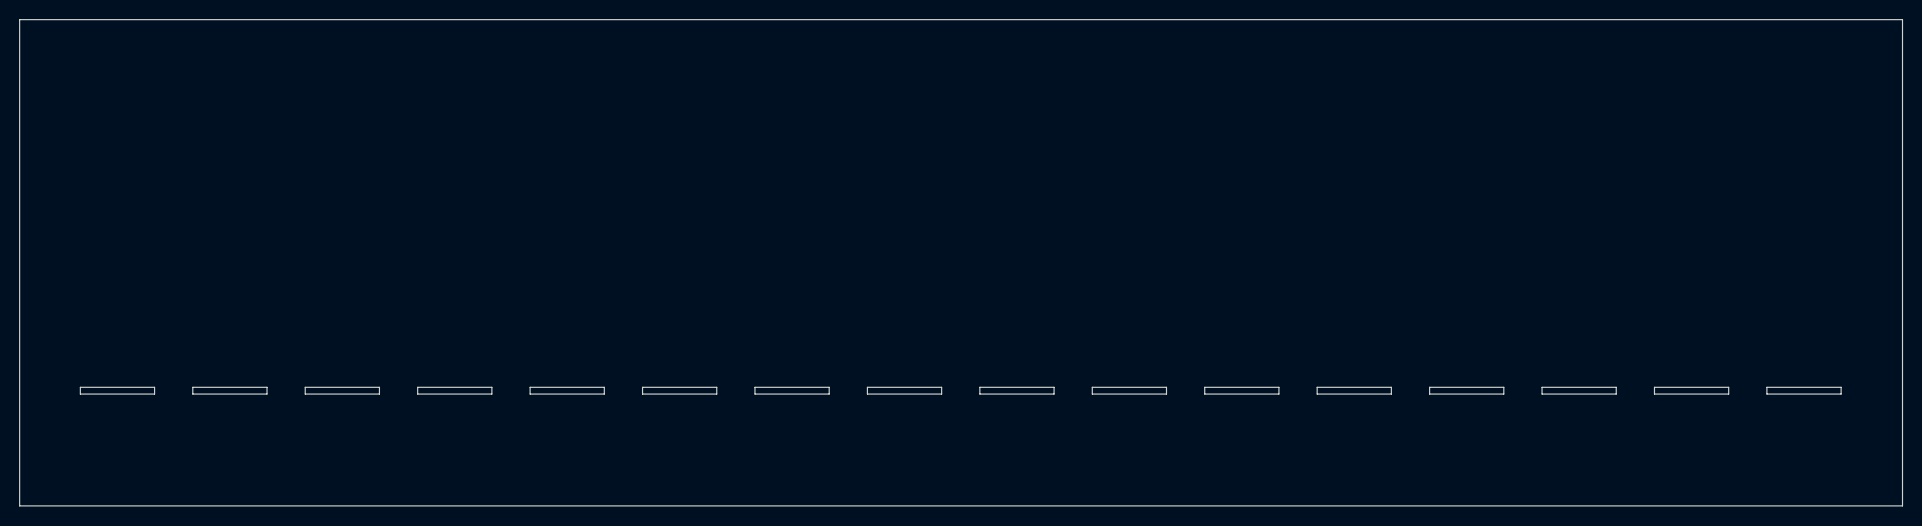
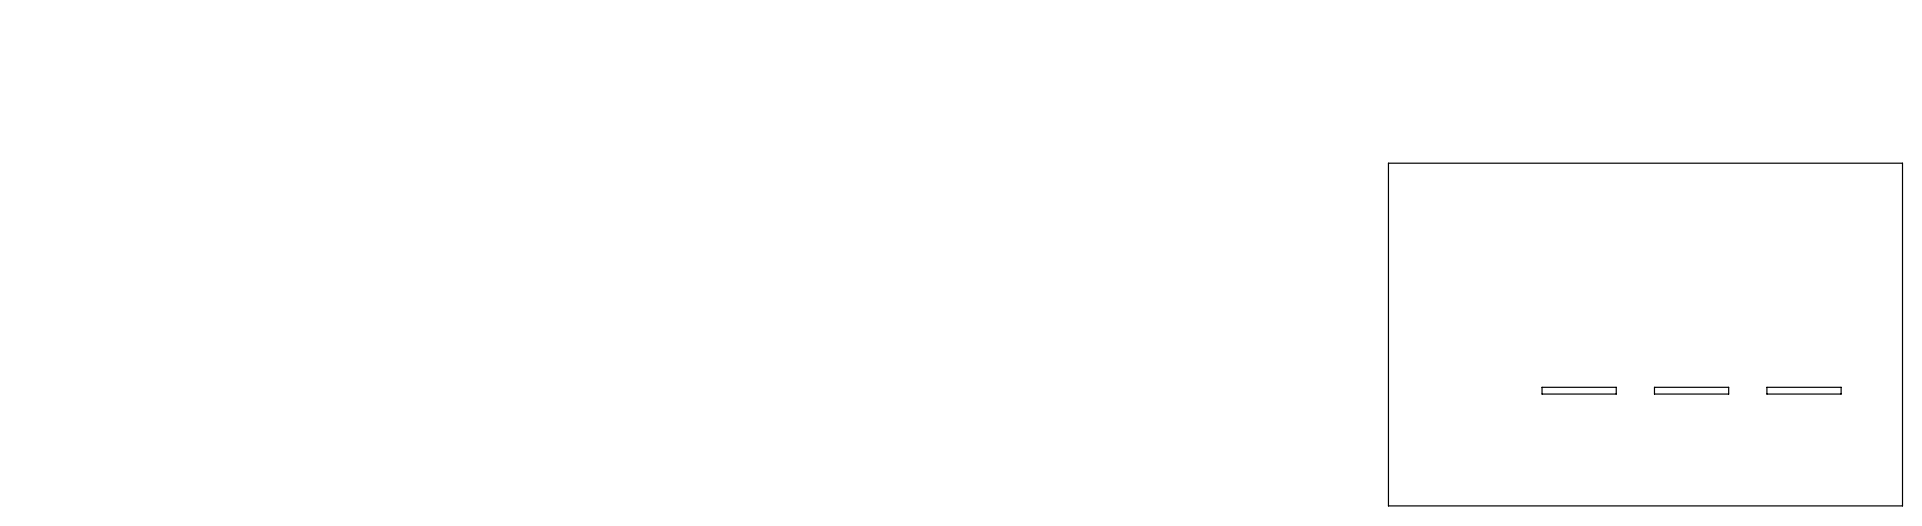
board edge: (1902, 163) (1902, 19) (19, 19) (19, 505) (1388, 505) -> (1902, 163) (1388, 163) (1388, 505)
board edge: (154, 387) (154, 394) (80, 394) (80, 387) (154, 387) -> none
board edge: (267, 387) (267, 394) (192, 394) (192, 387) (267, 387) -> none
board edge: (379, 387) (305, 387) (305, 394) (379, 394) (379, 387) -> none
board edge: (491, 387) (417, 387) (417, 394) (491, 394) (491, 387) -> none
board edge: (604, 387) (530, 387) (530, 394) (604, 394) (604, 387) -> none
board edge: (716, 387) (642, 387) (642, 394) (716, 394) (716, 387) -> none
board edge: (829, 387) (754, 387) (754, 394) (829, 394) (829, 387) -> none
board edge: (941, 387) (867, 387) (867, 394) (941, 394) (941, 387) -> none
board edge: (1054, 387) (979, 387) (979, 394) (1054, 394) (1054, 387) -> none
board edge: (1166, 387) (1092, 387) (1092, 394) (1166, 394) (1166, 387) -> none
board edge: (1278, 387) (1204, 387) (1204, 394) (1278, 394) (1278, 387) -> none
board edge: (1391, 387) (1317, 387) (1317, 394) (1391, 394) (1391, 387) -> none
board edge: (1503, 387) (1429, 387) (1429, 394) (1503, 394) (1503, 387) -> none

